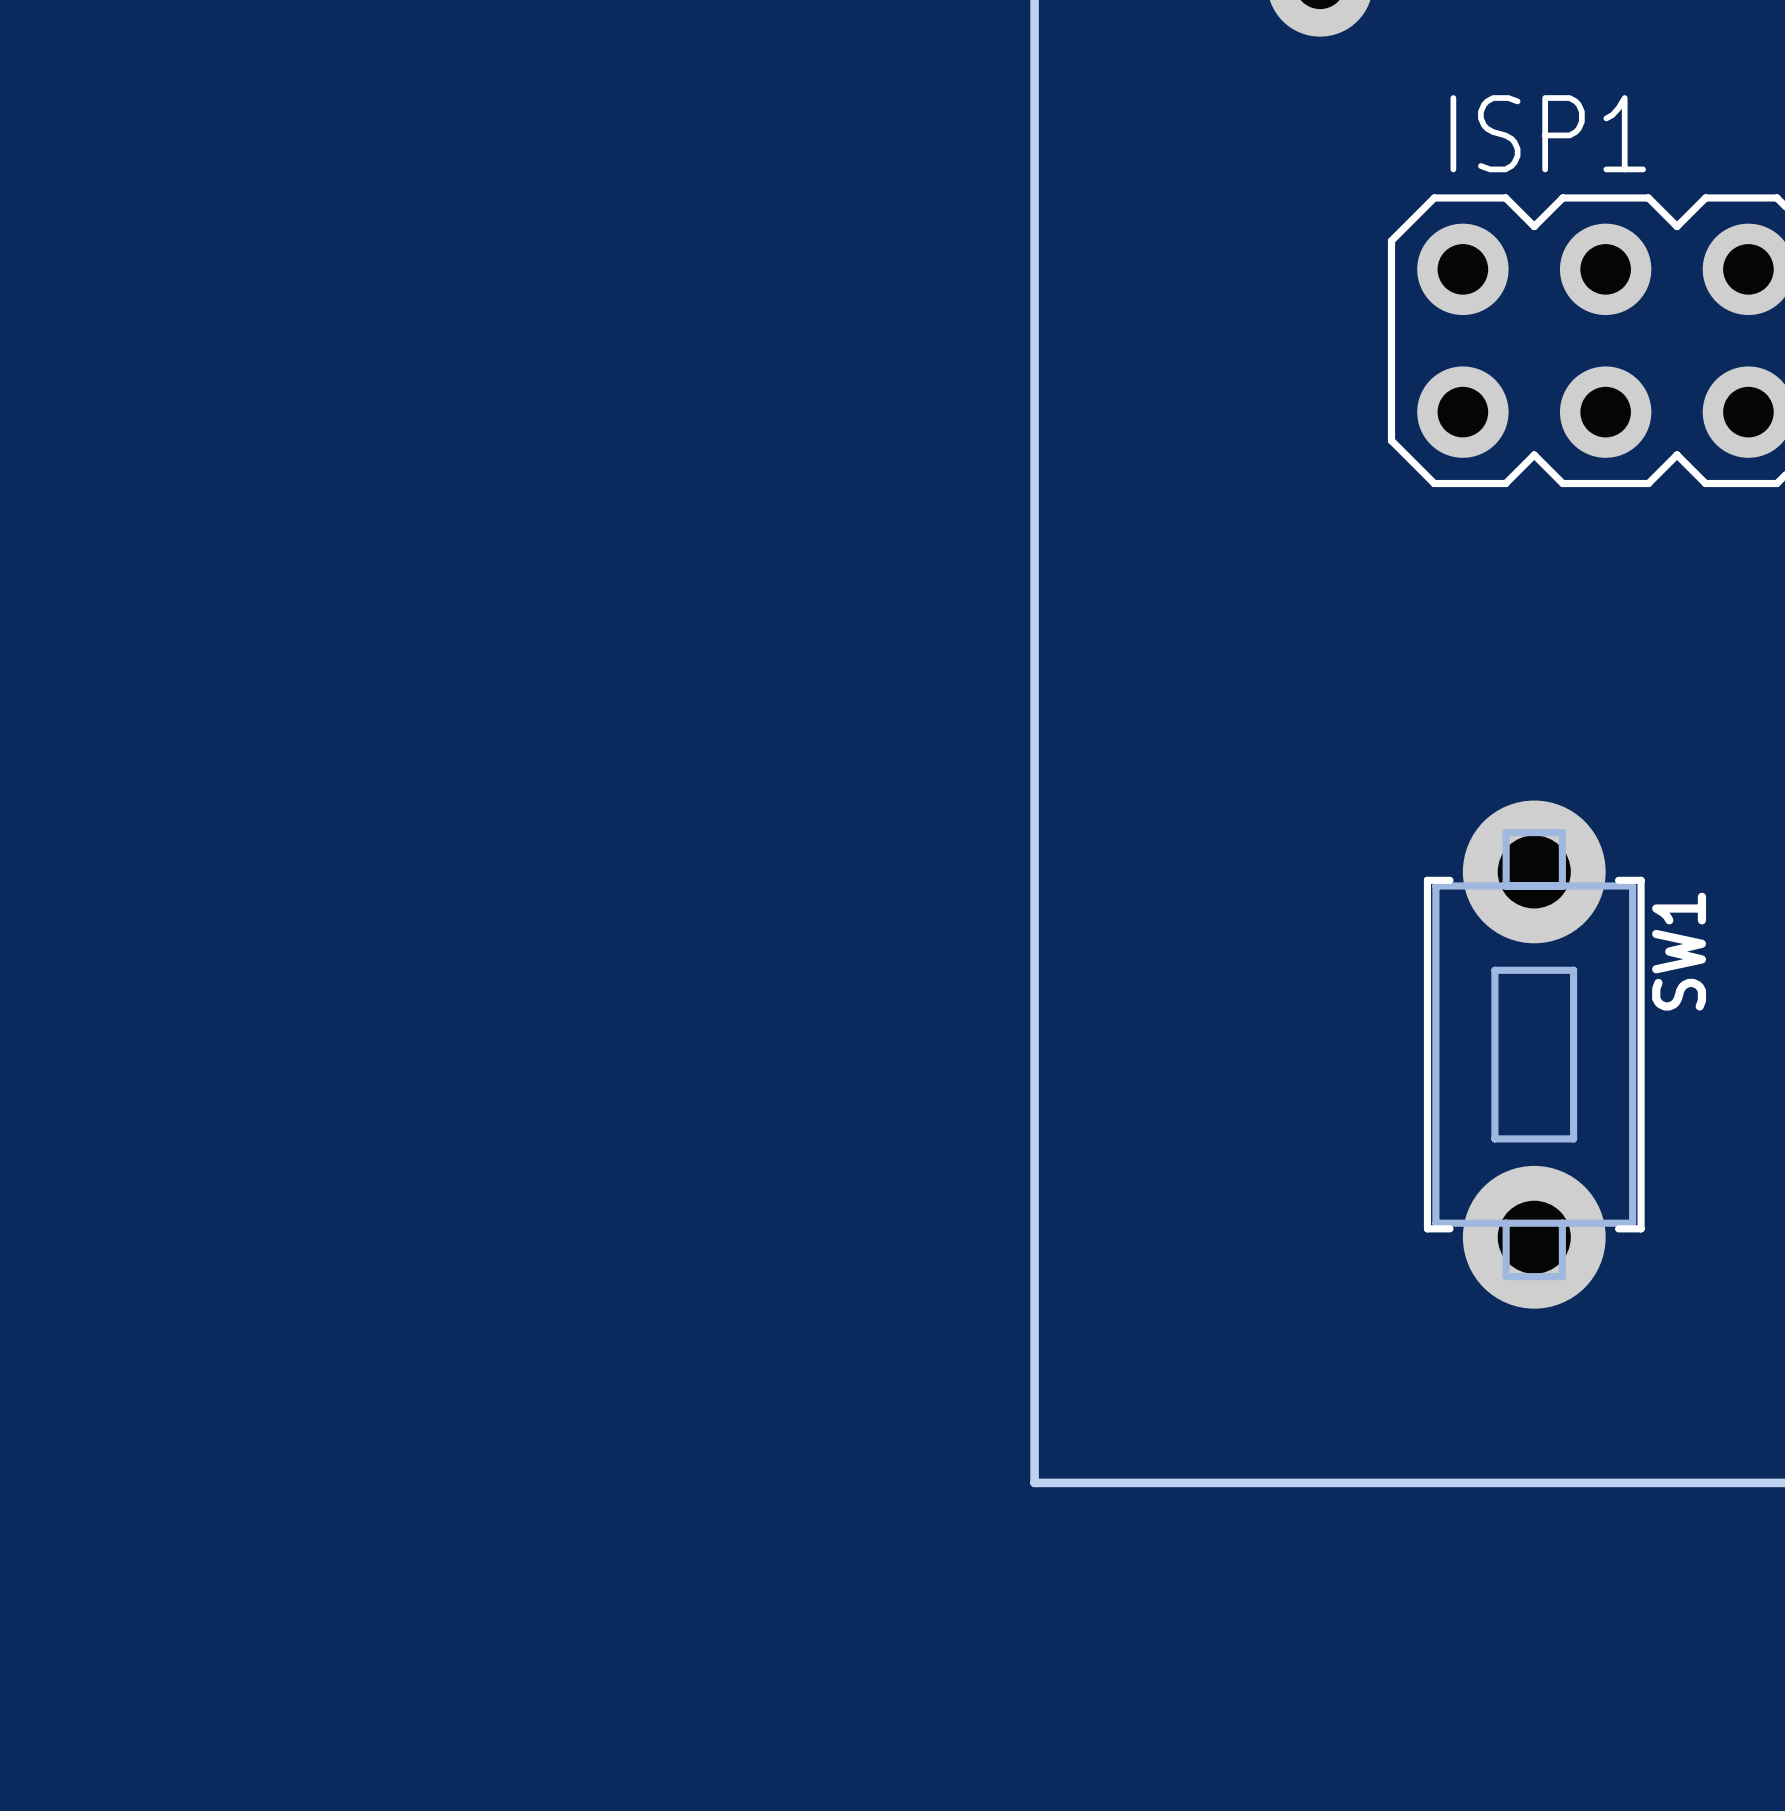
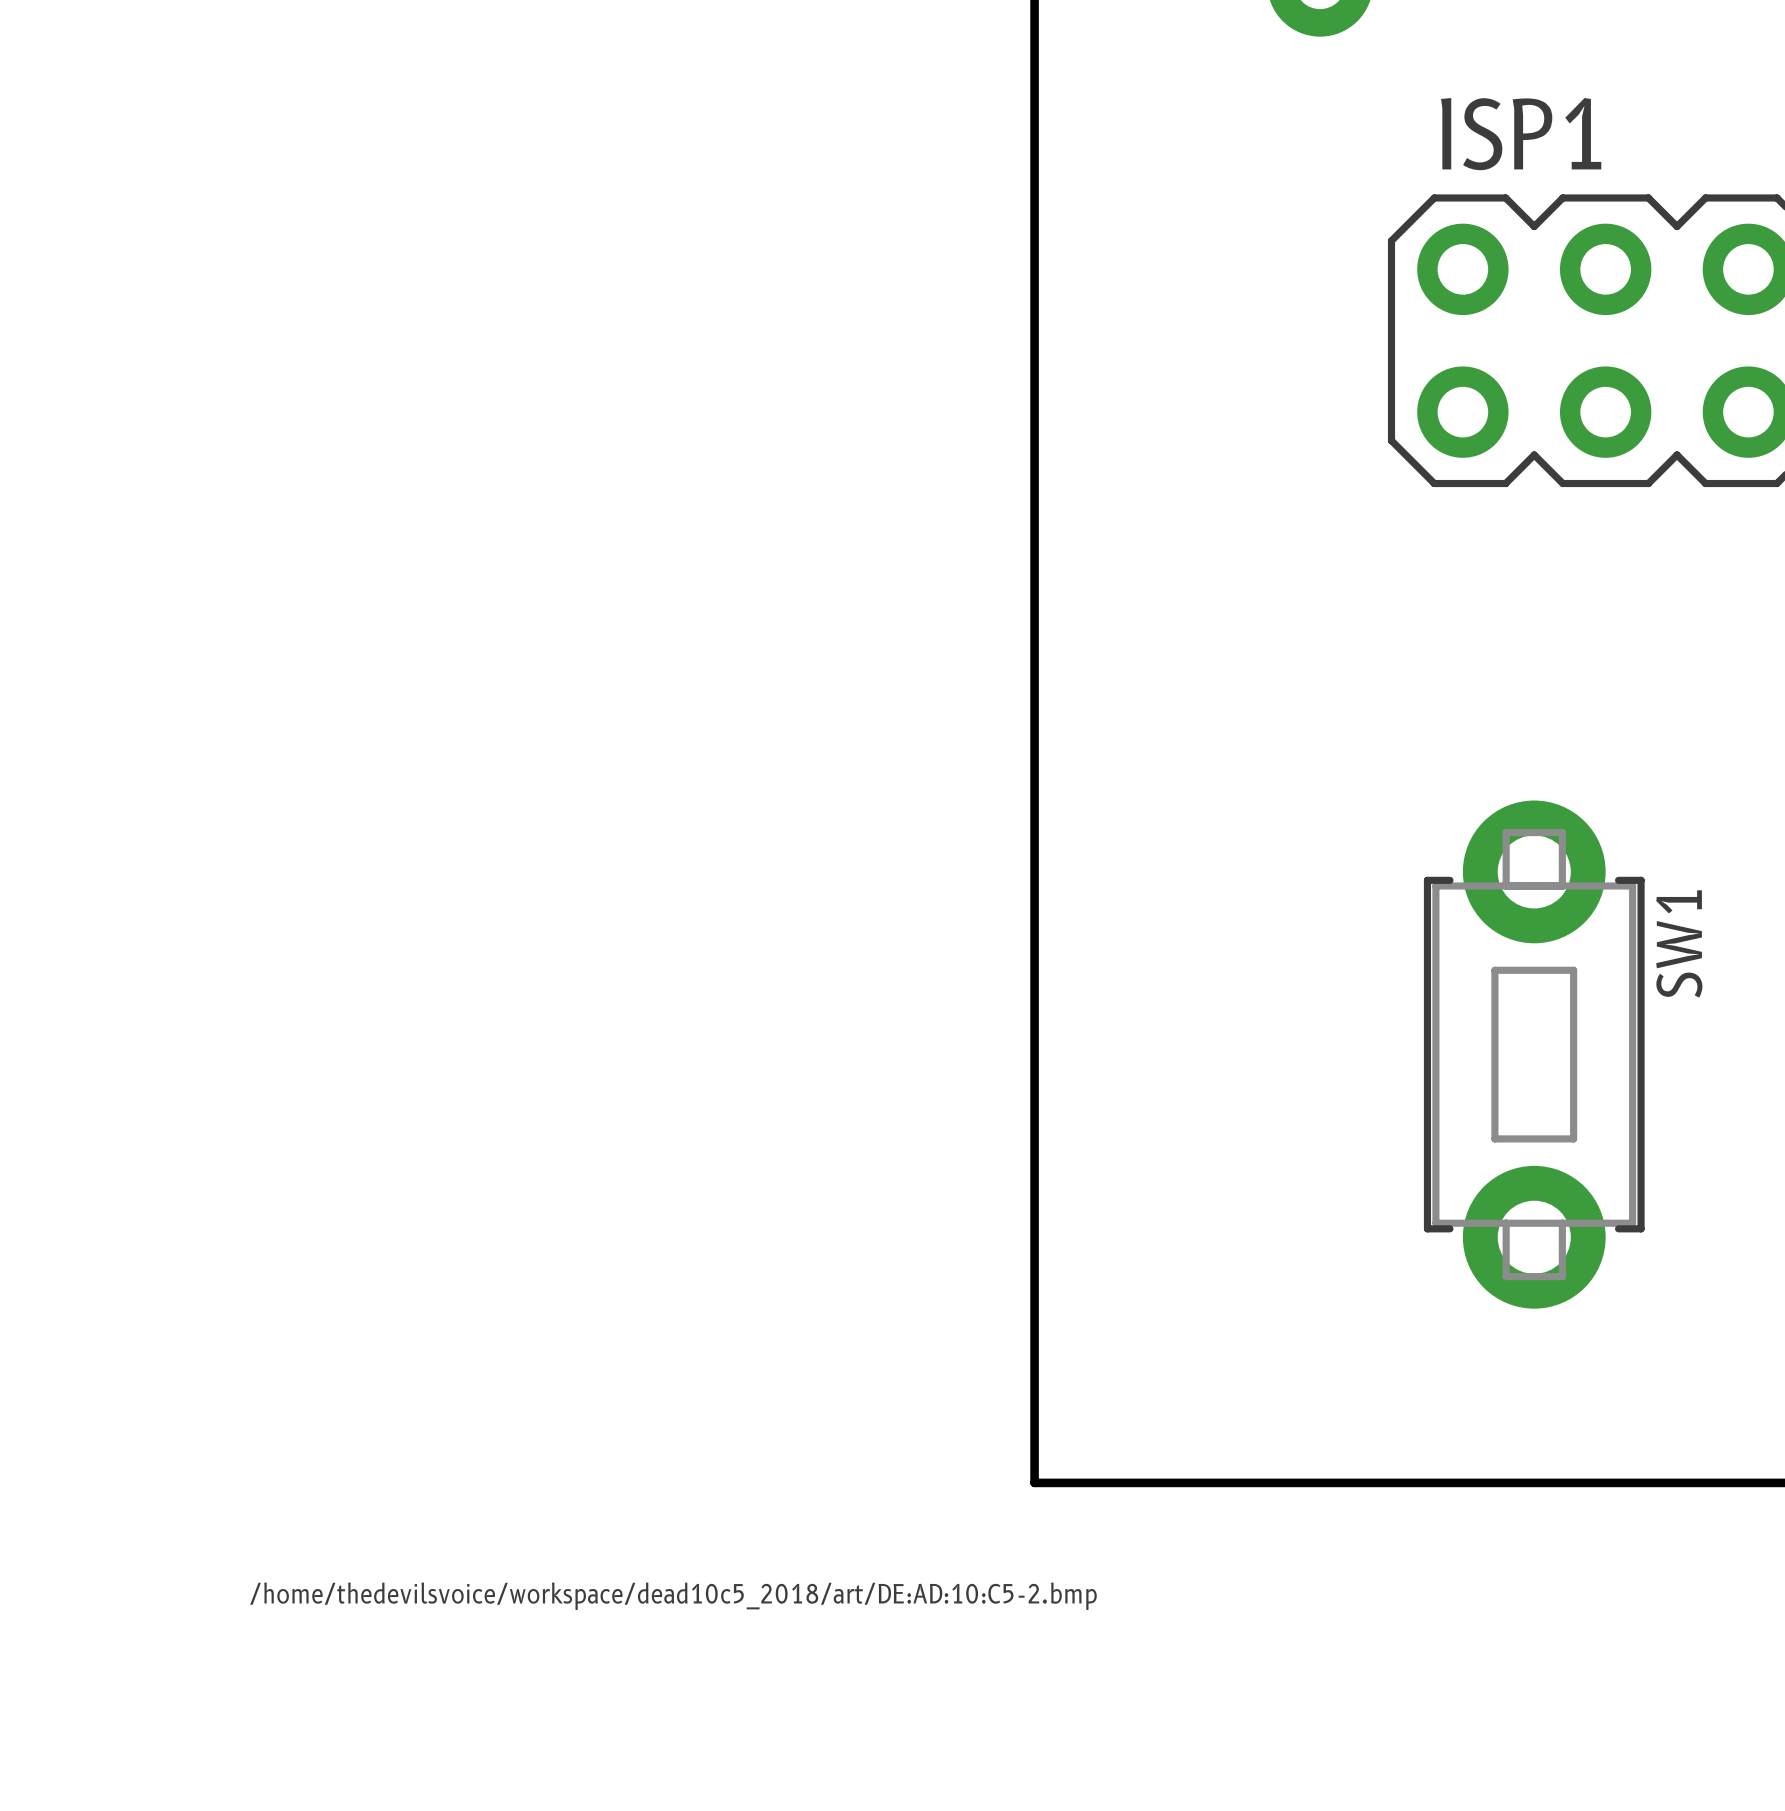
text: none -> /home/thedevilsvoice/workspace/dead10c5_2018/art/DE:AD:10:C5-2.bmp (673, 1596)

